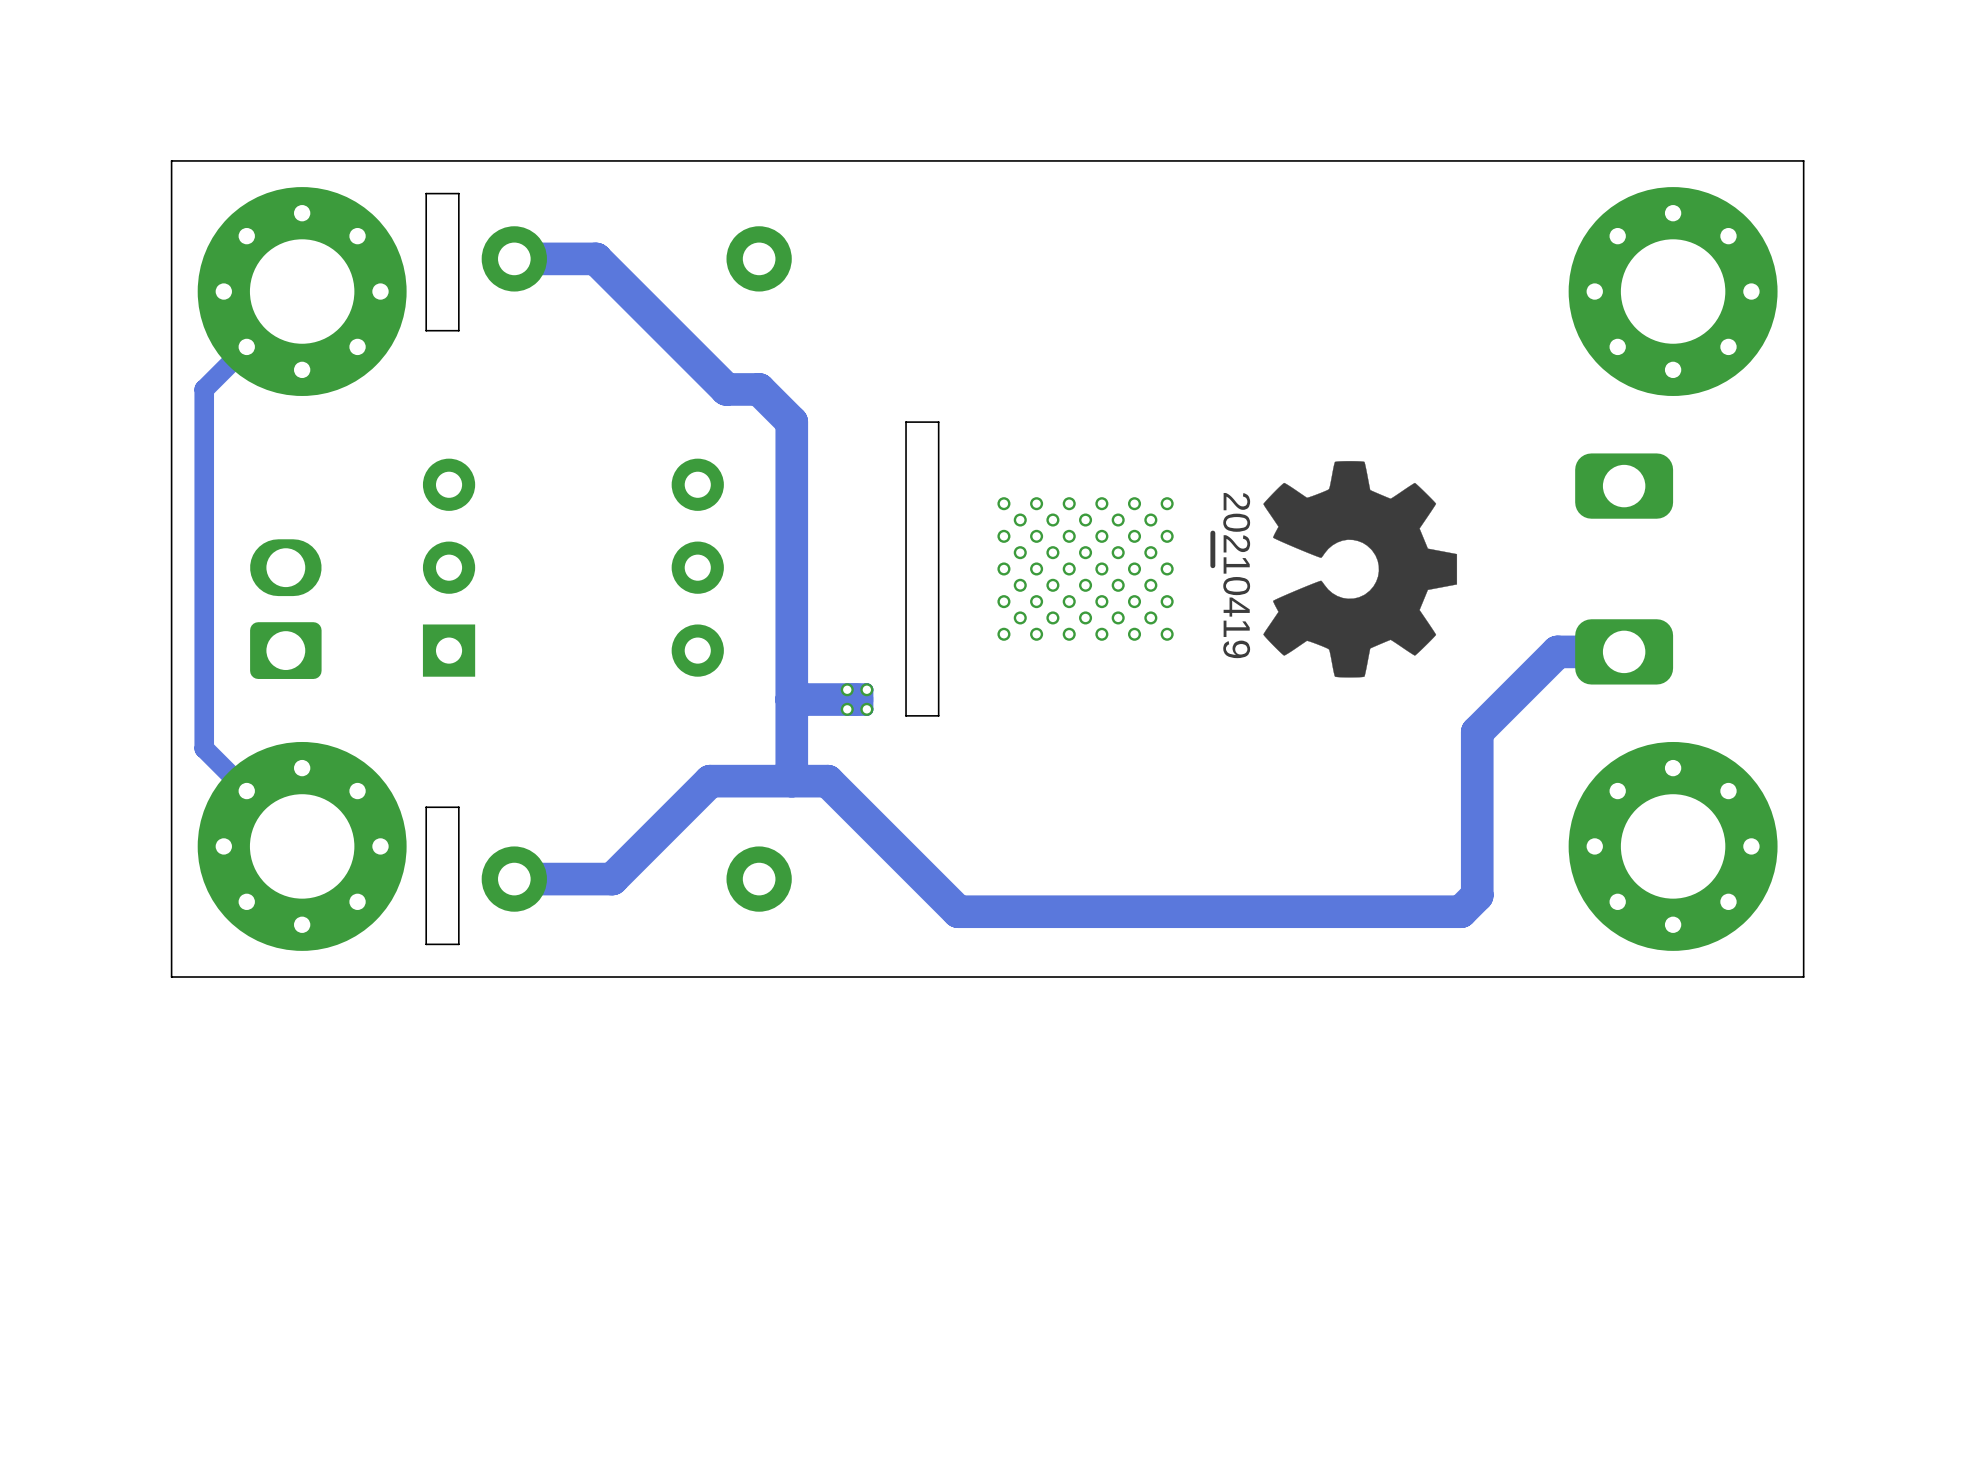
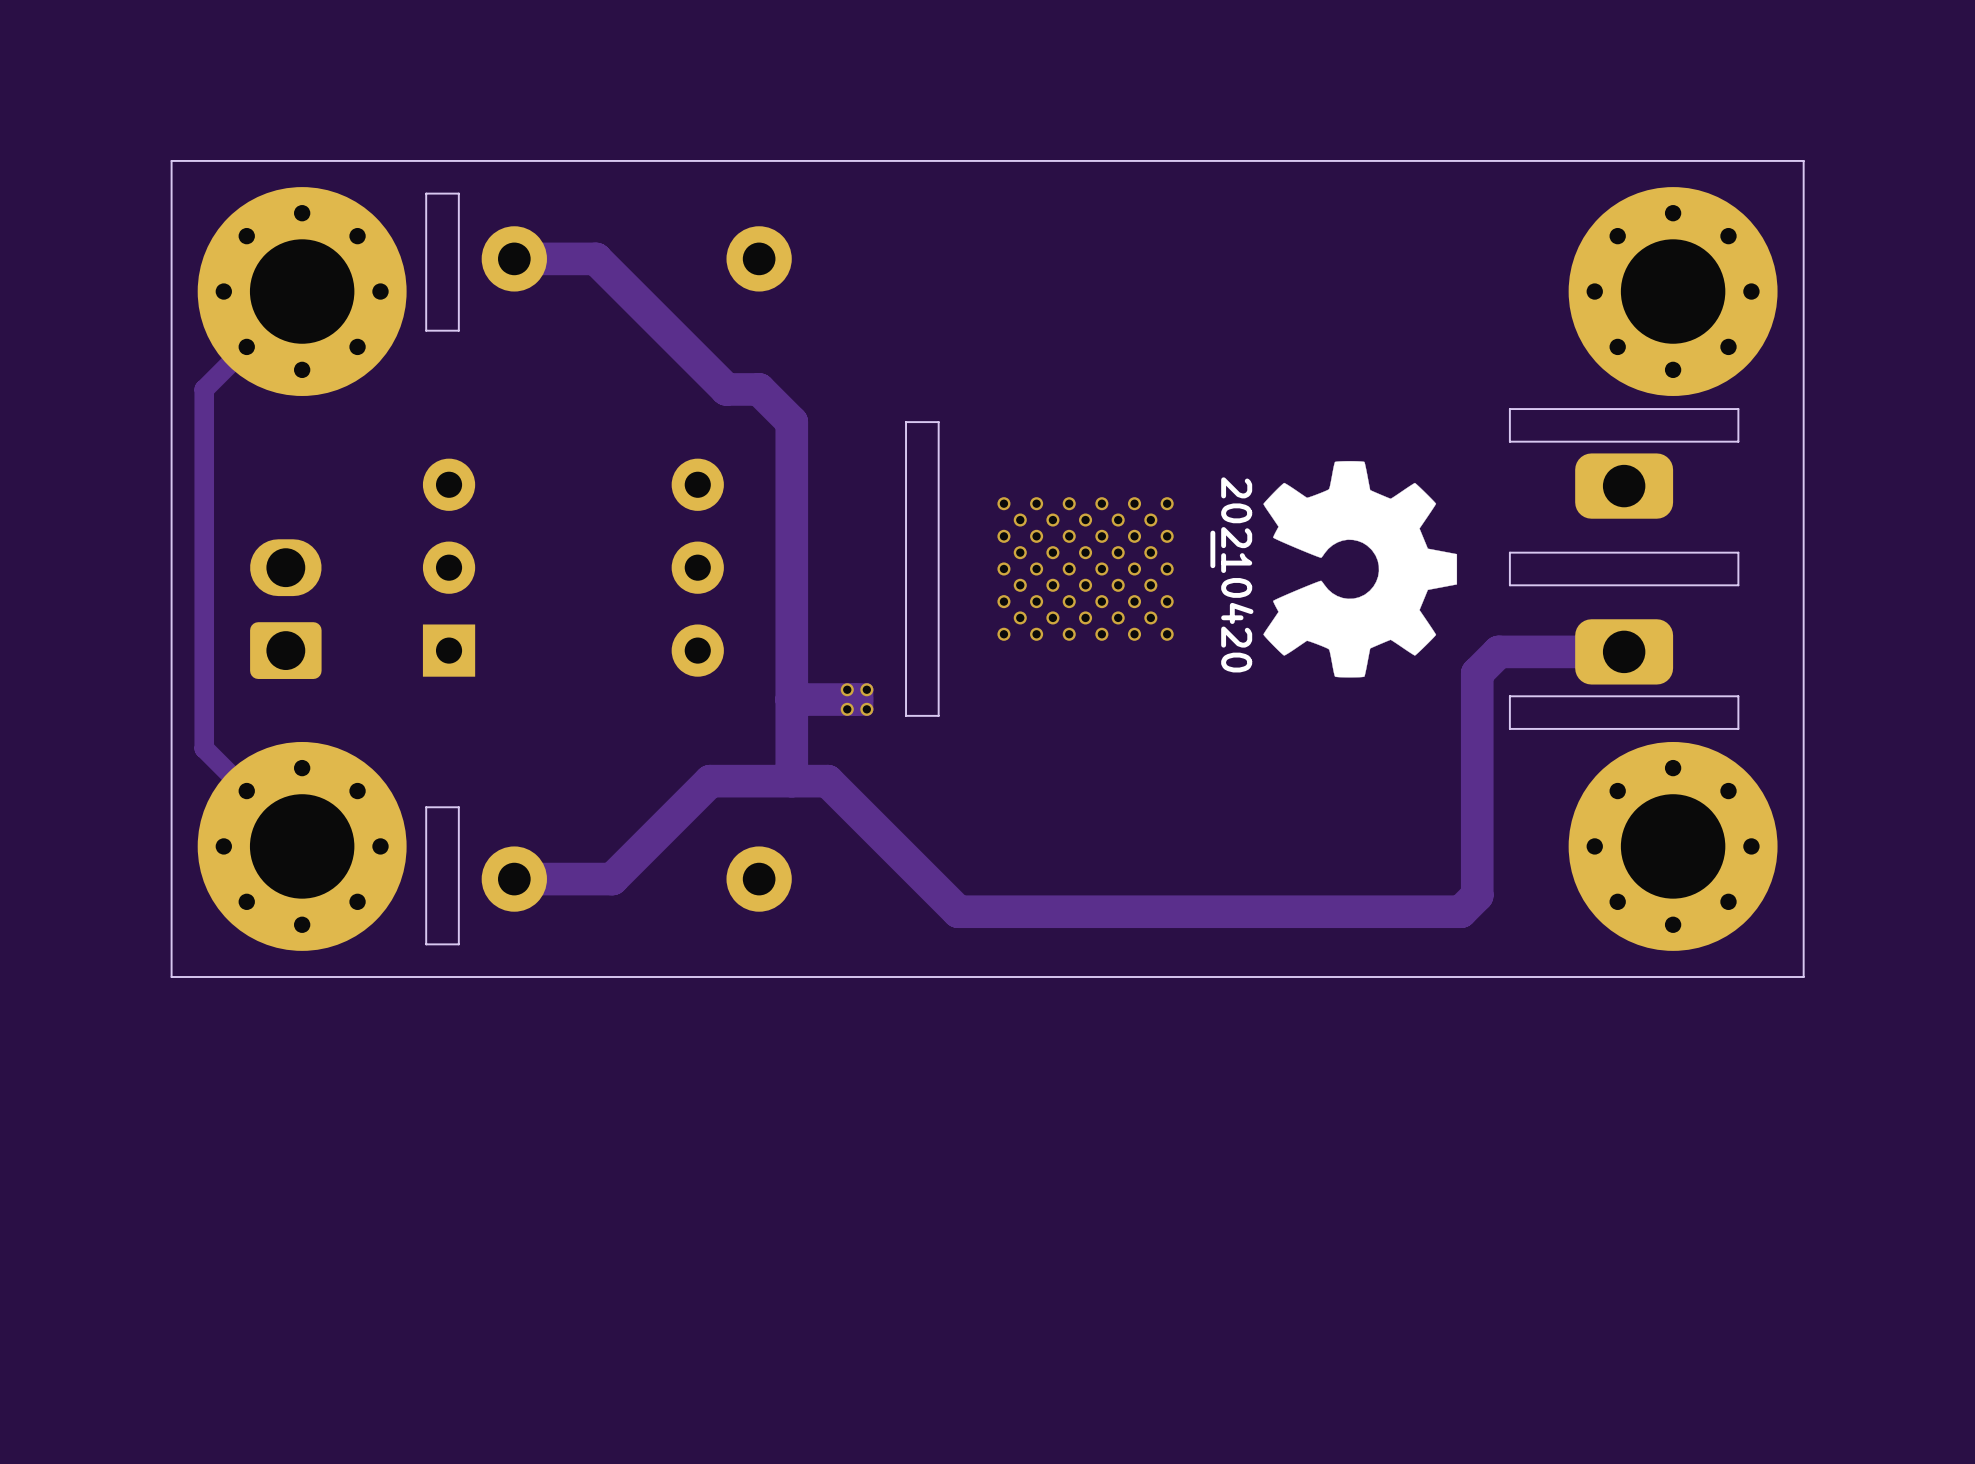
board edge: none -> (1738, 409) (1738, 441) (1509, 441) (1509, 409) (1738, 409)
drawing shape: [1210, 492, 1251, 659] -> [1210, 477, 1254, 673]
board edge: none -> (1738, 552) (1738, 585) (1509, 585) (1509, 552) (1738, 552)
track: (1557, 651) (1477, 732) -> (1557, 651) (1498, 651) (1477, 673) (1477, 732)
board edge: none -> (1738, 696) (1738, 728) (1509, 728) (1509, 696) (1738, 696)

